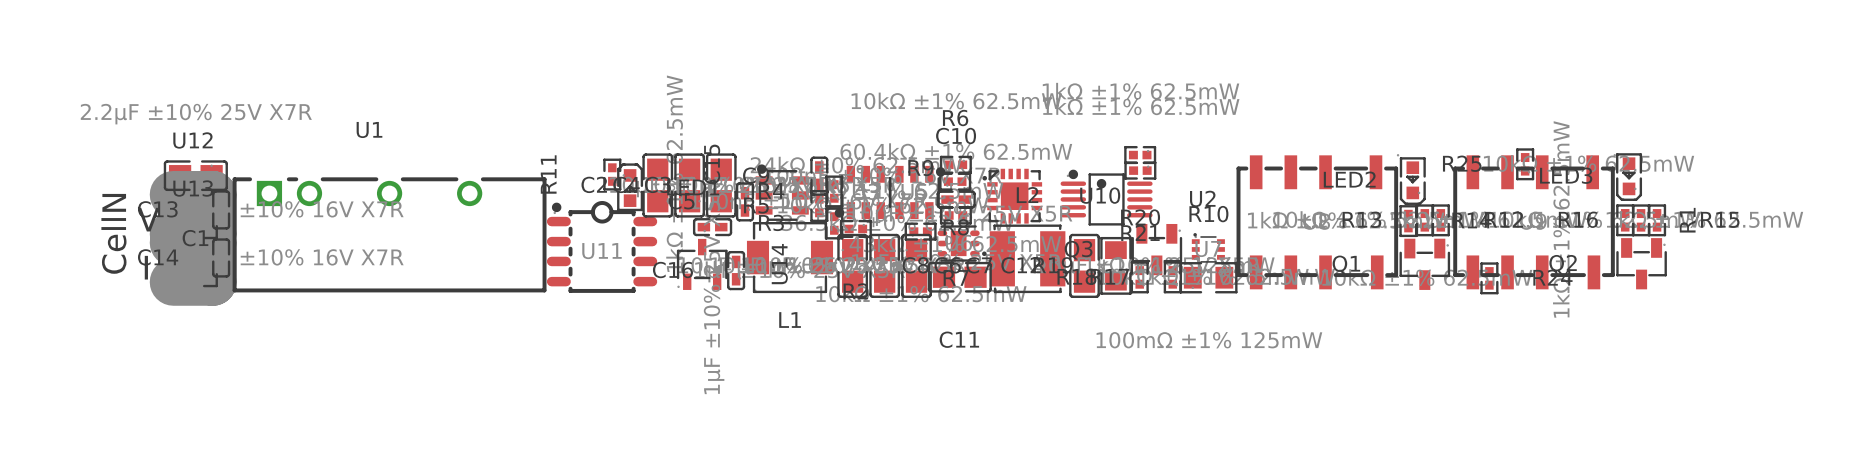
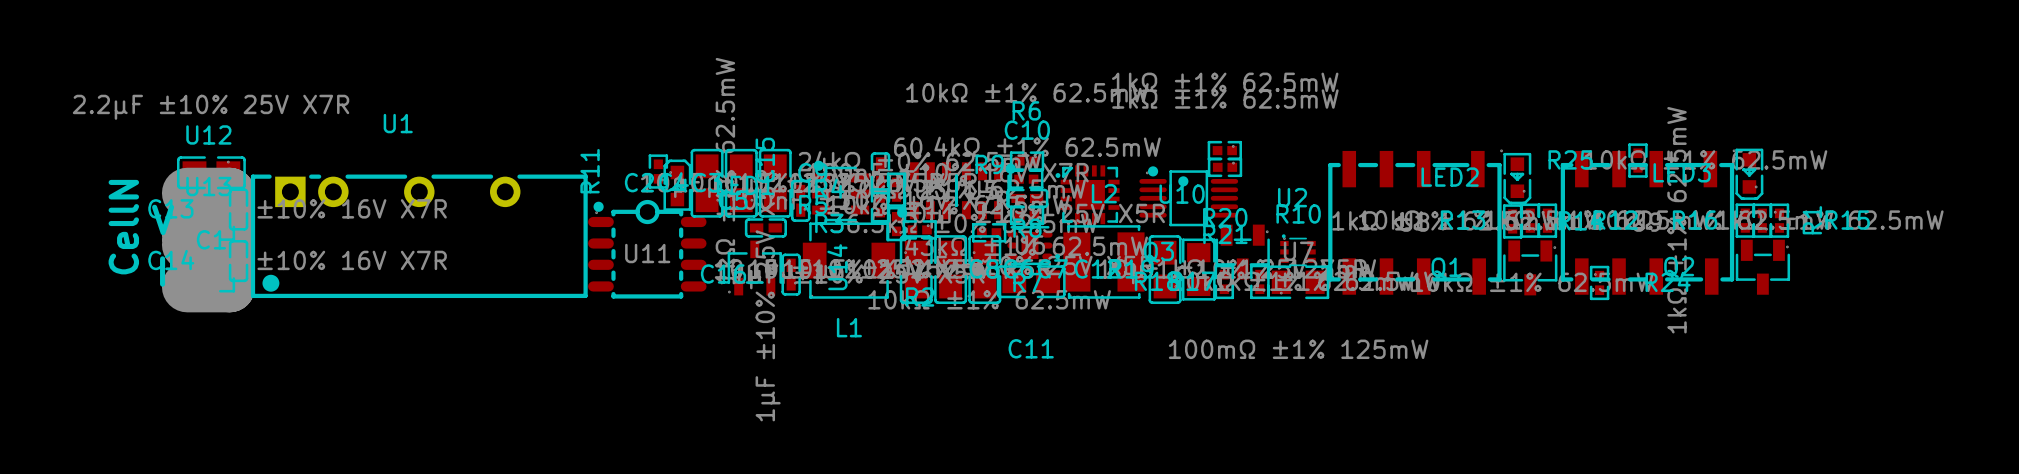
U1 footprint: [232, 177, 547, 293] -> [250, 174, 588, 299]

